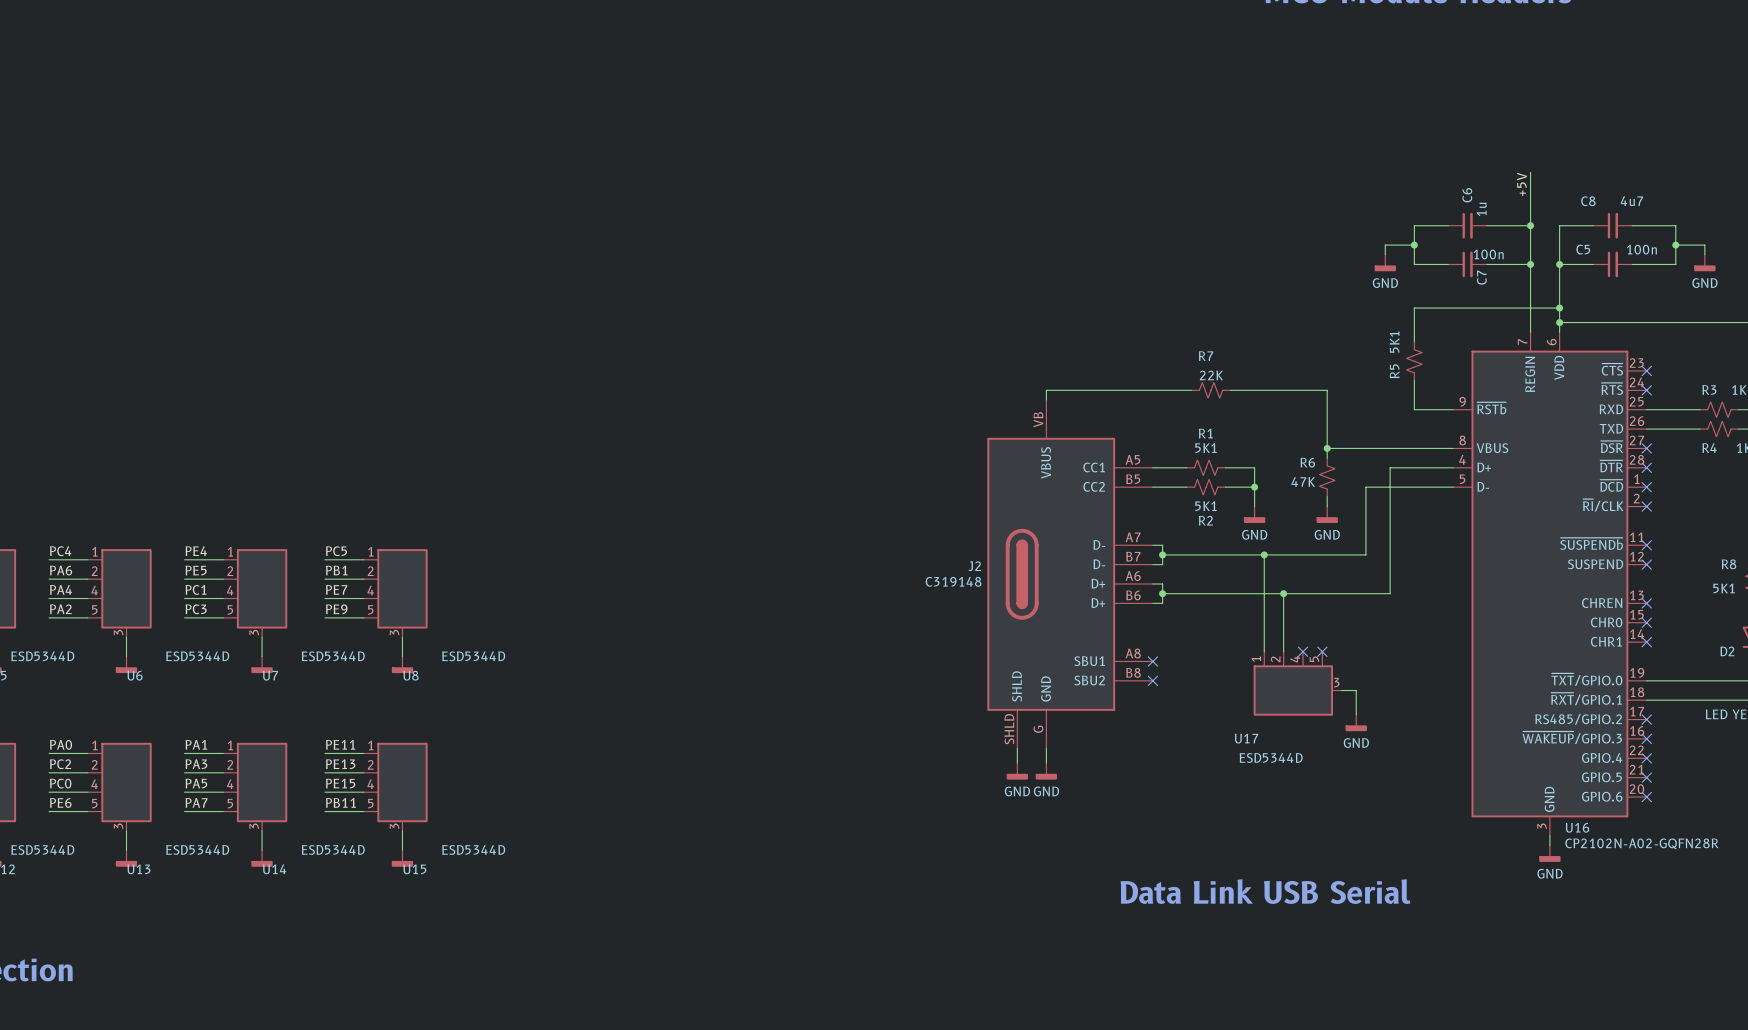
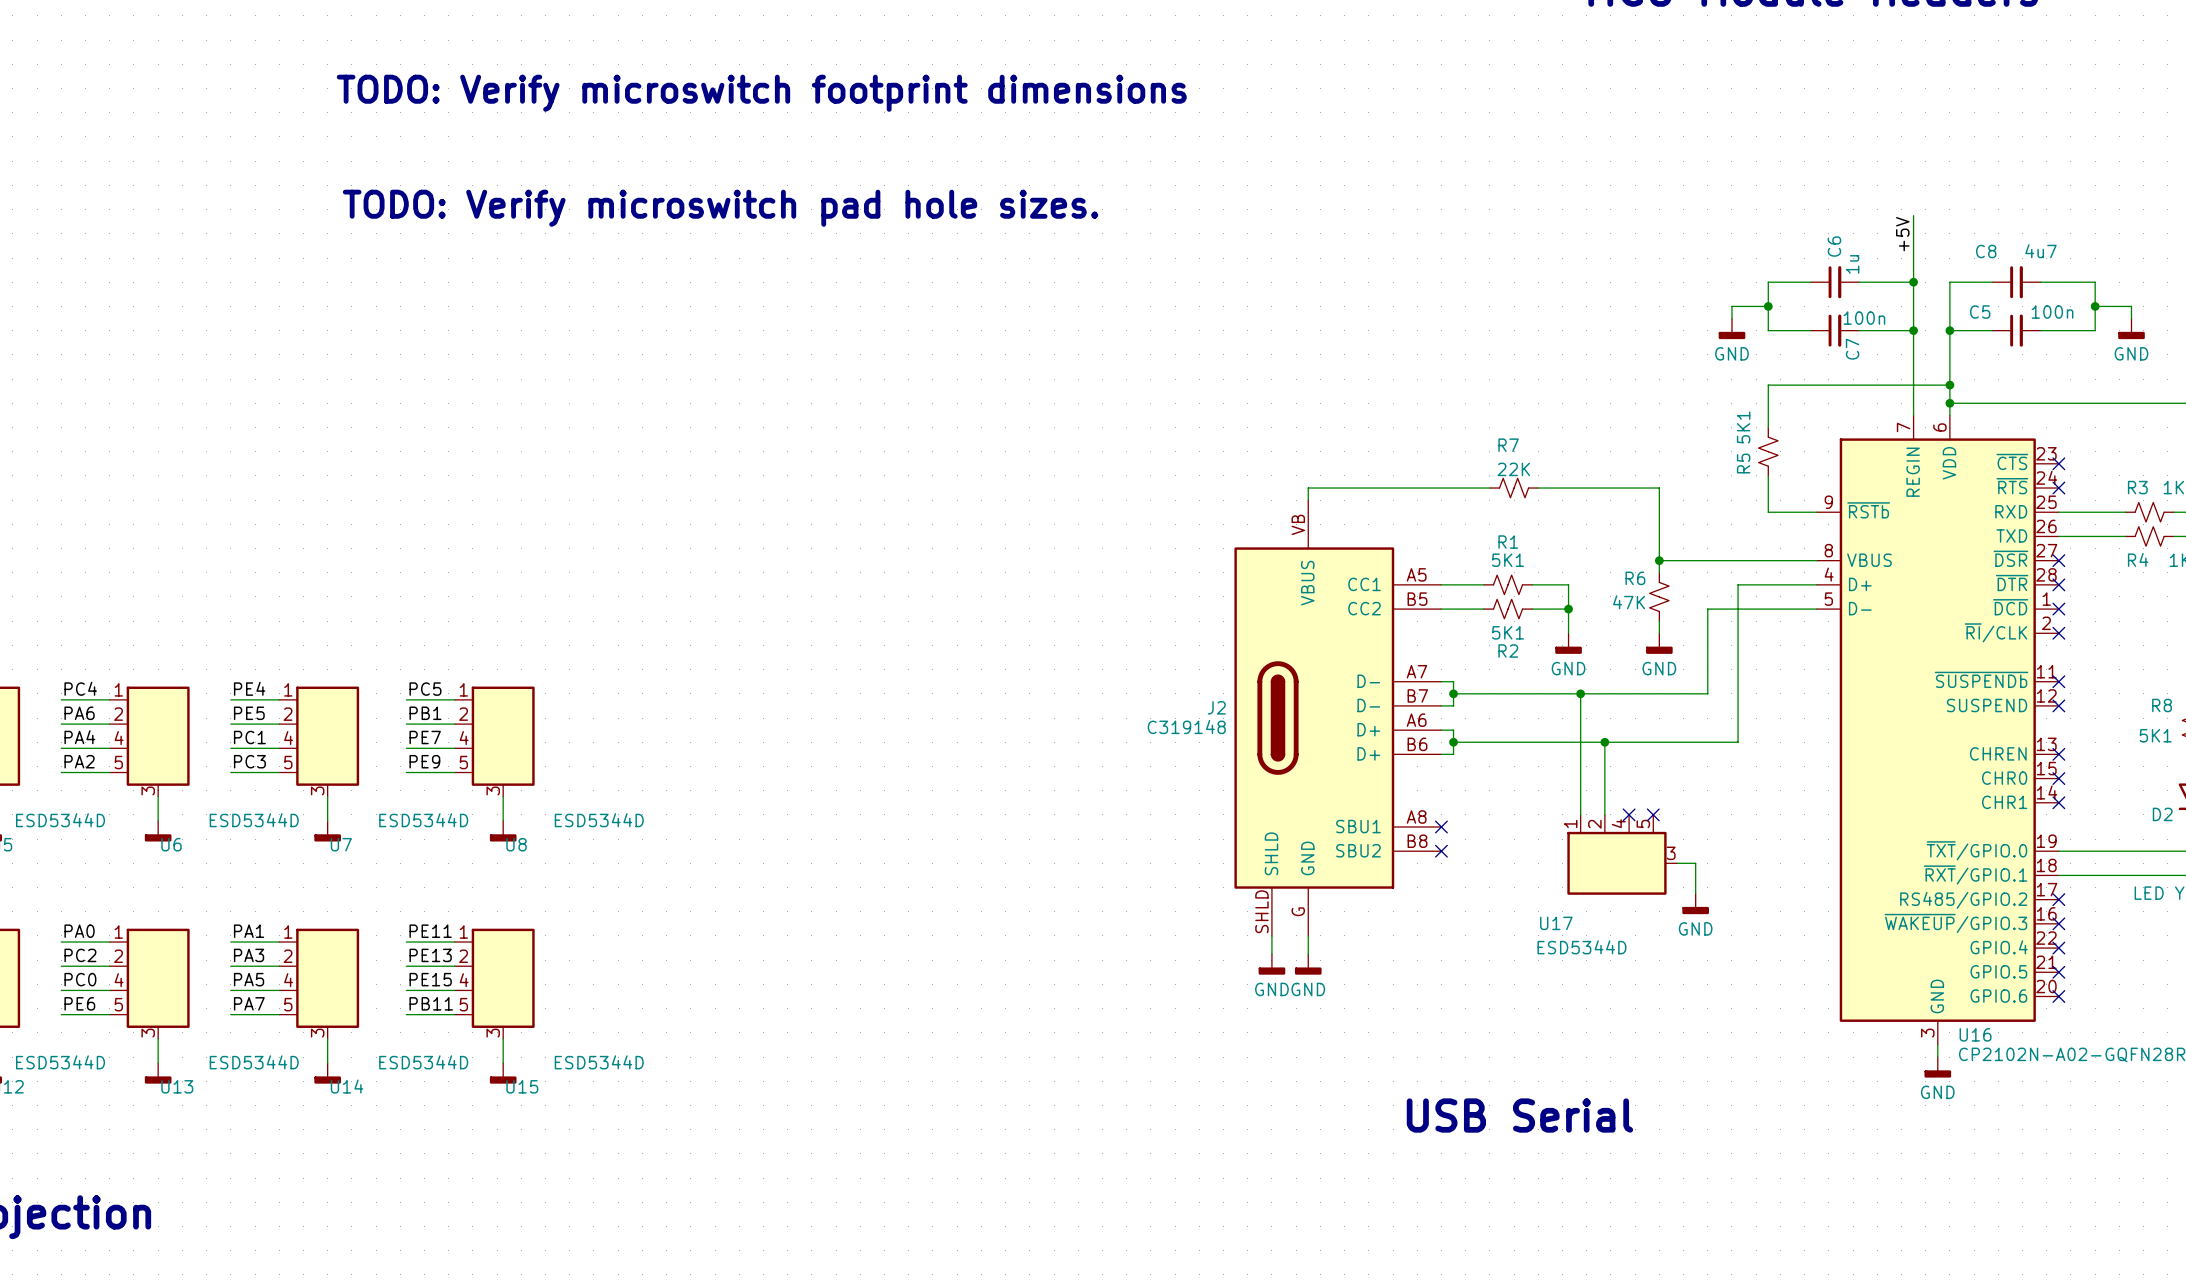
text: none -> TODO: Verify microswitch footprint dimensions (761, 93)
text: none -> TODO: Verify microswitch pad hole sizes. (720, 208)
text: Data Link USB Serial (1265, 891) -> USB Serial (1519, 1115)

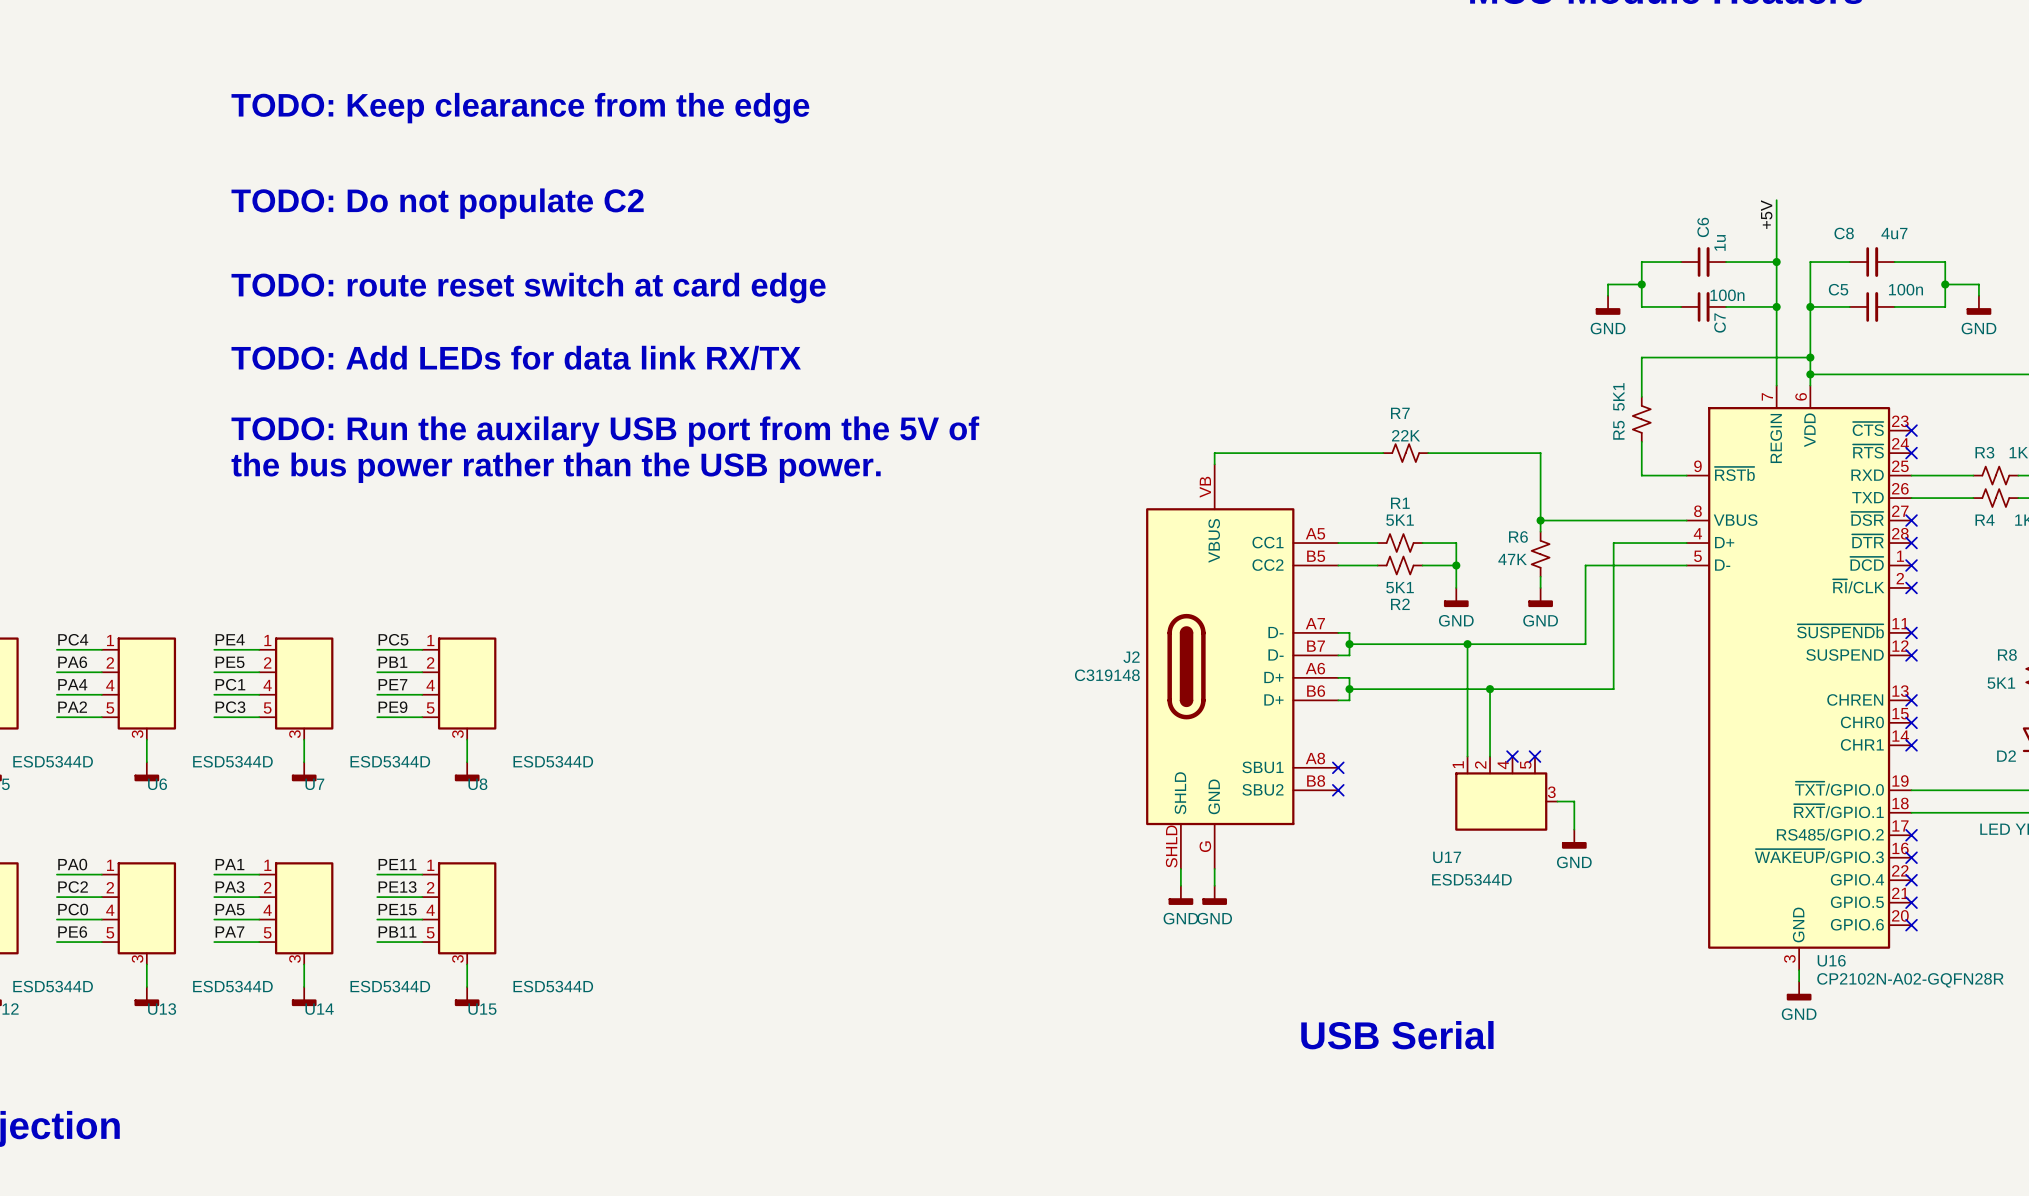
text: TODO: Verify microswitch footprint dimensions (761, 93) -> none
text: none -> TODO: Keep clearance from the edge (520, 108)
text: TODO: Verify microswitch pad hole sizes. (720, 208) -> none
text: none -> TODO: Do not populate C2 (437, 203)
text: none -> TODO: route reset switch at card edge (528, 288)
text: none -> TODO: Add LEDs for data link RX/TX (516, 357)
text: none -> TODO: Run the auxilary USB port from the 5V of (605, 431)
text: none -> the bus power rather than the USB power. (556, 467)

